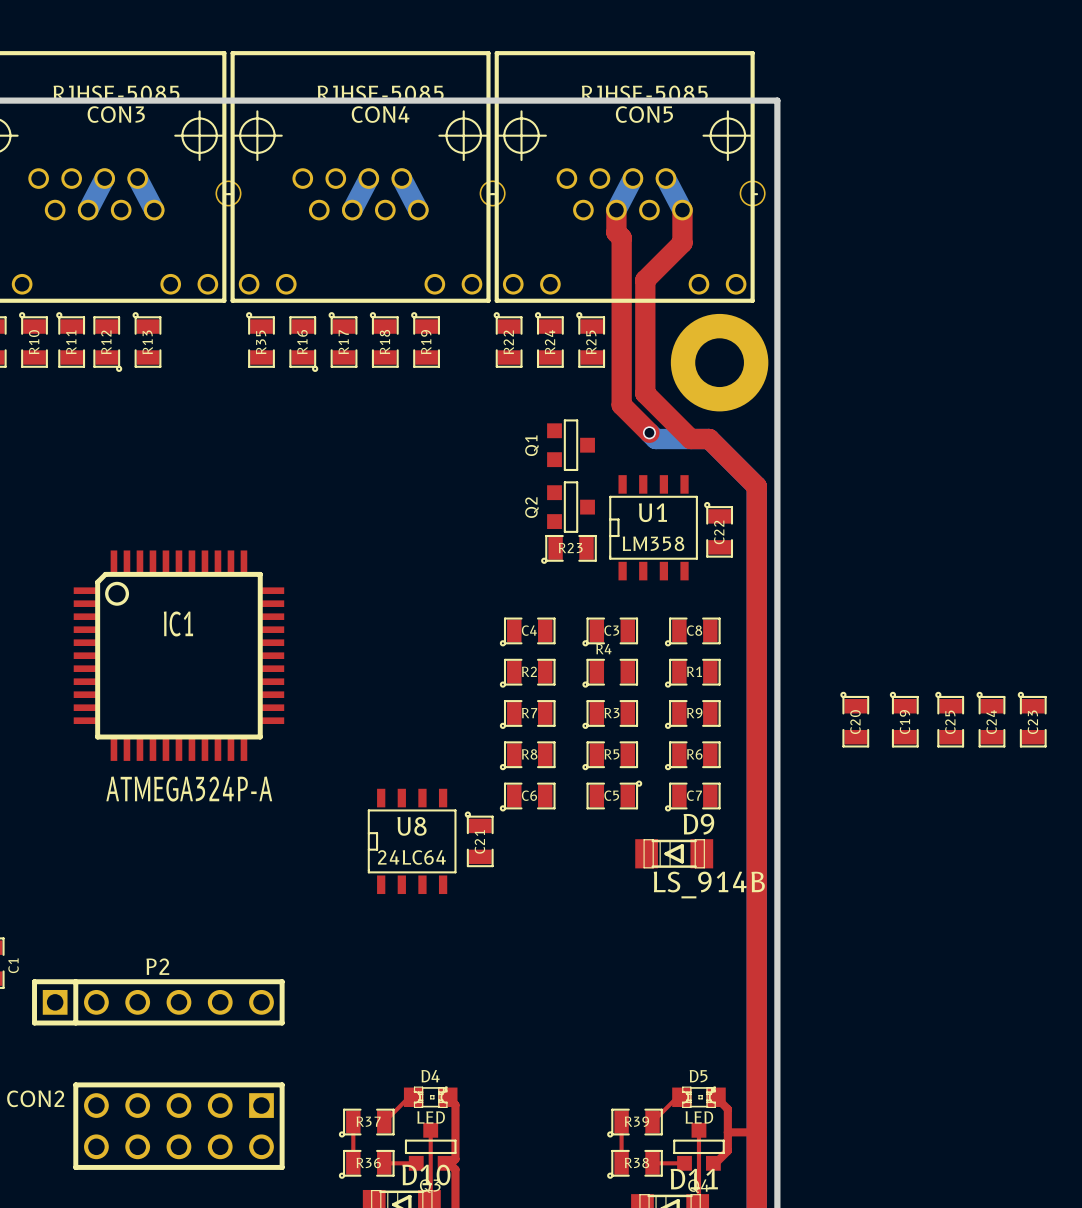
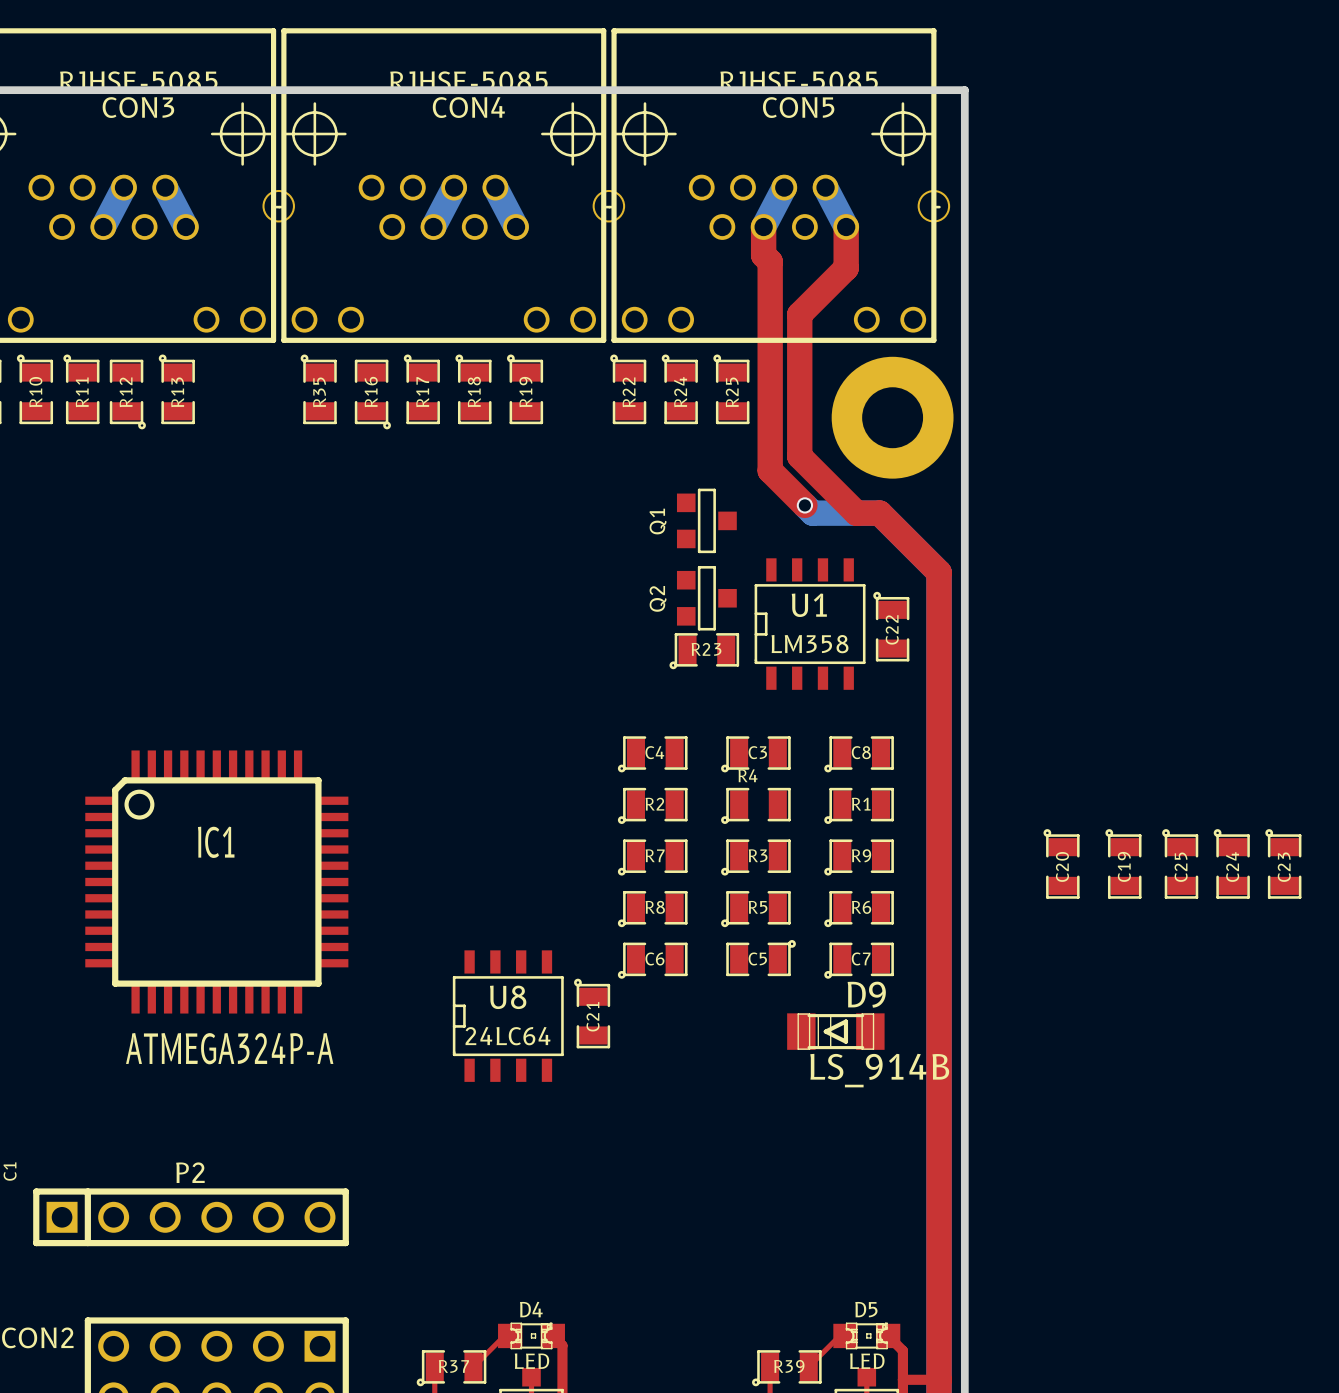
IC1 position: (178, 655) -> (216, 881)

